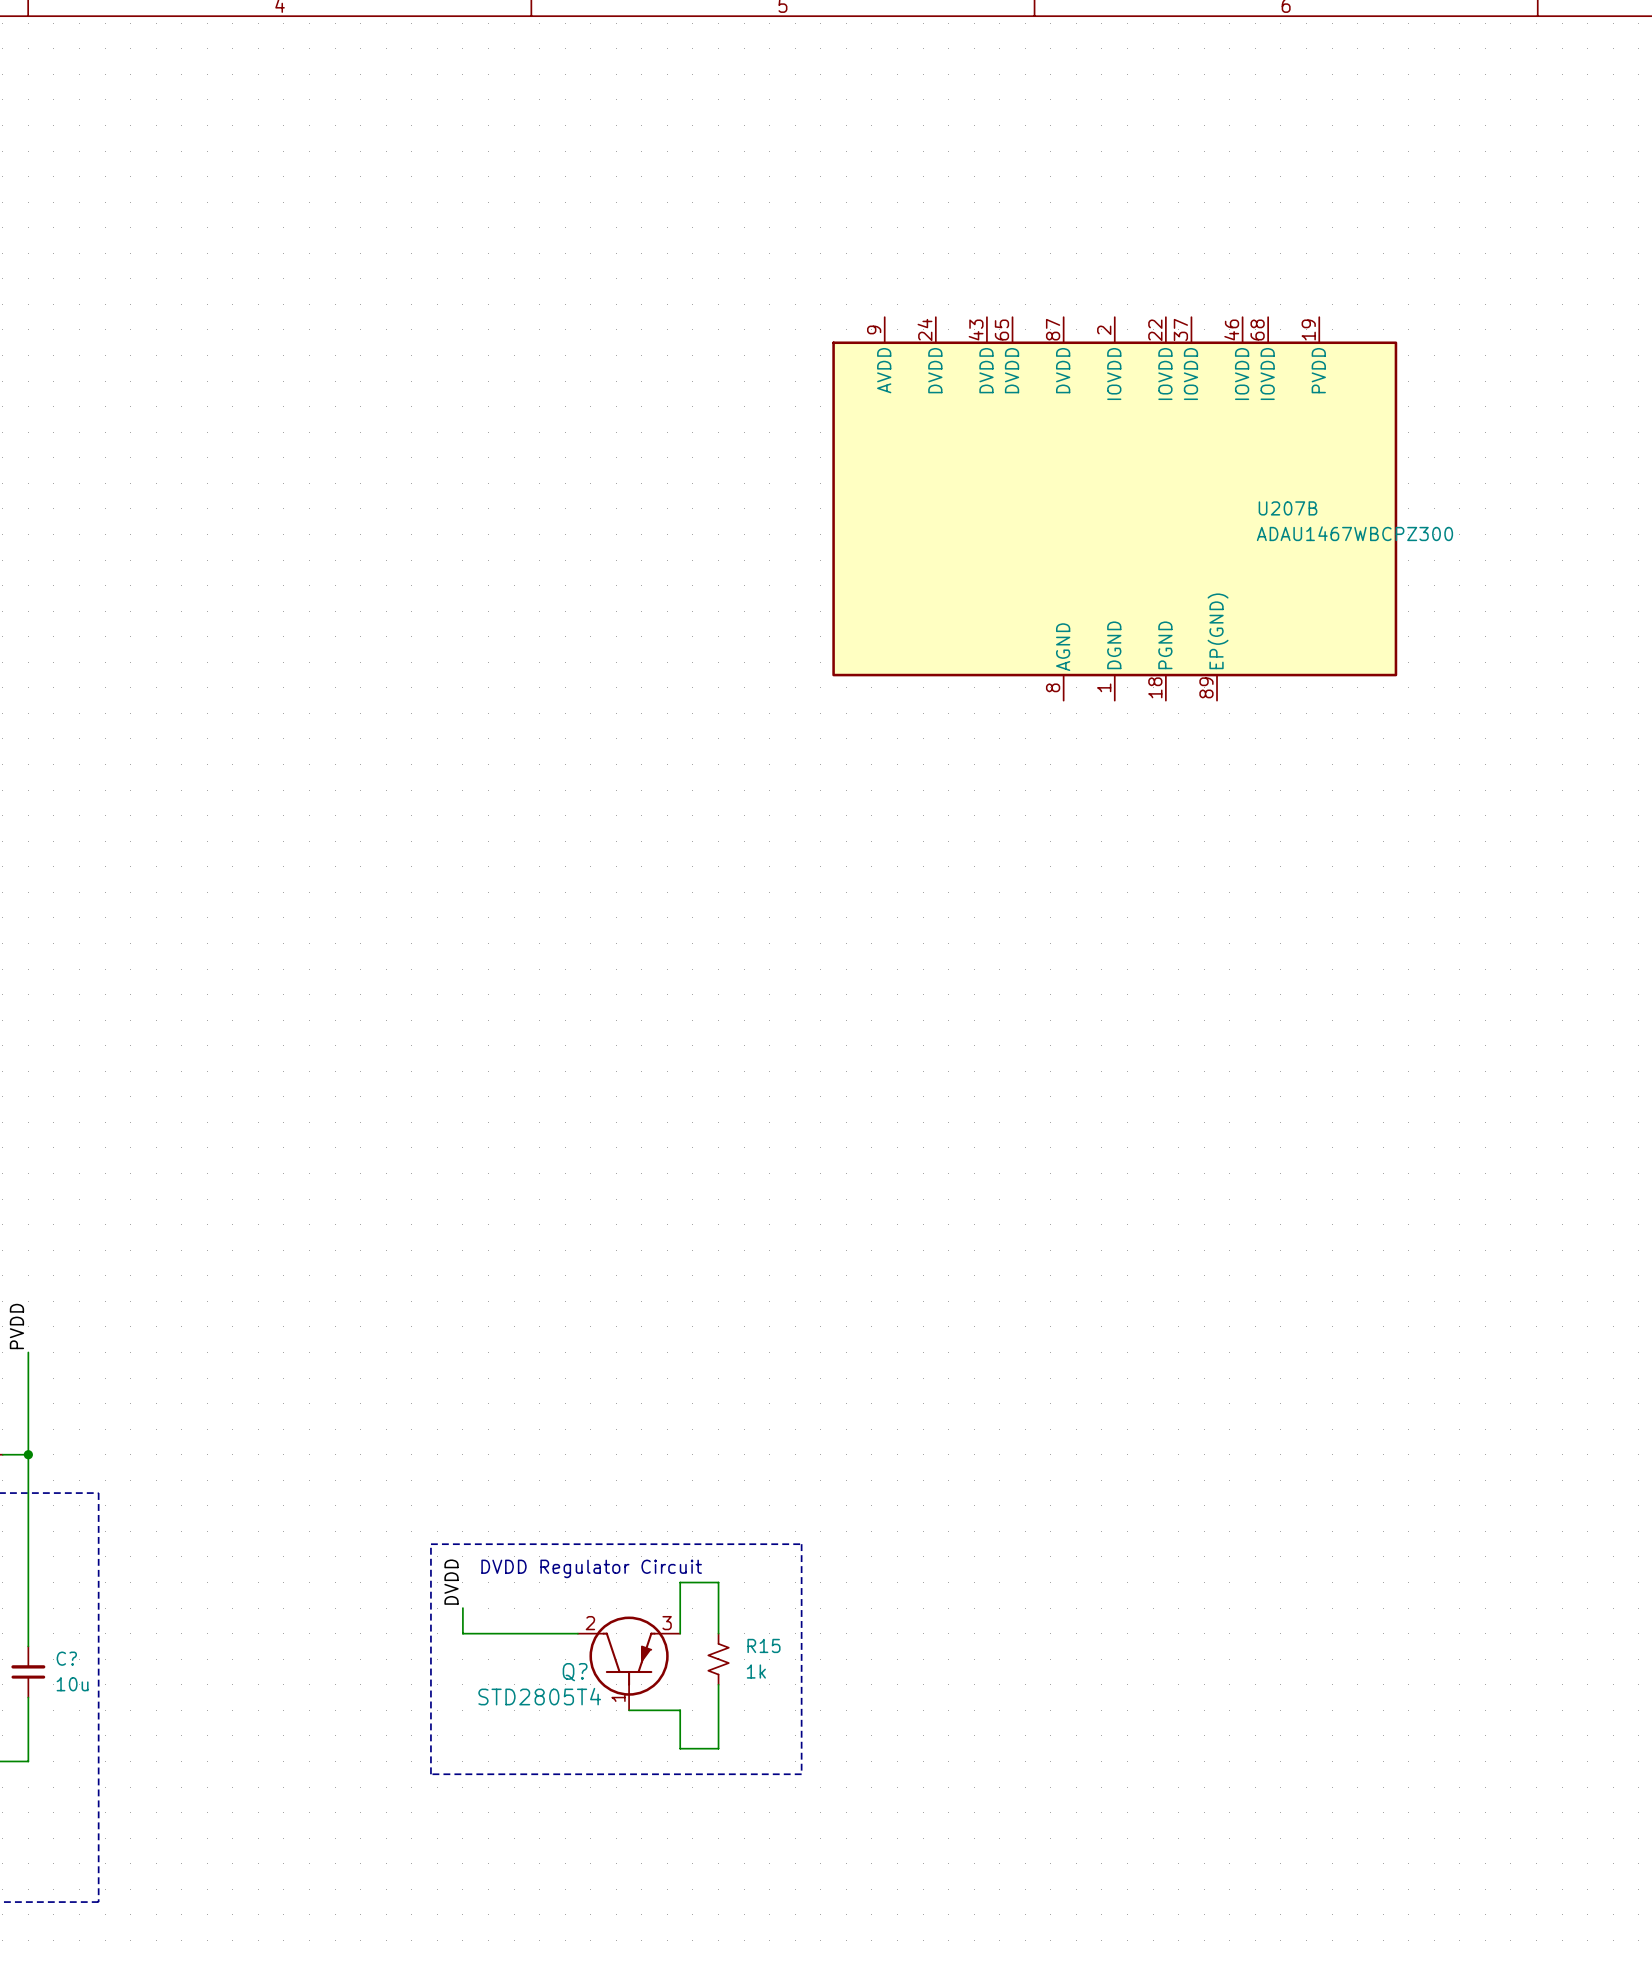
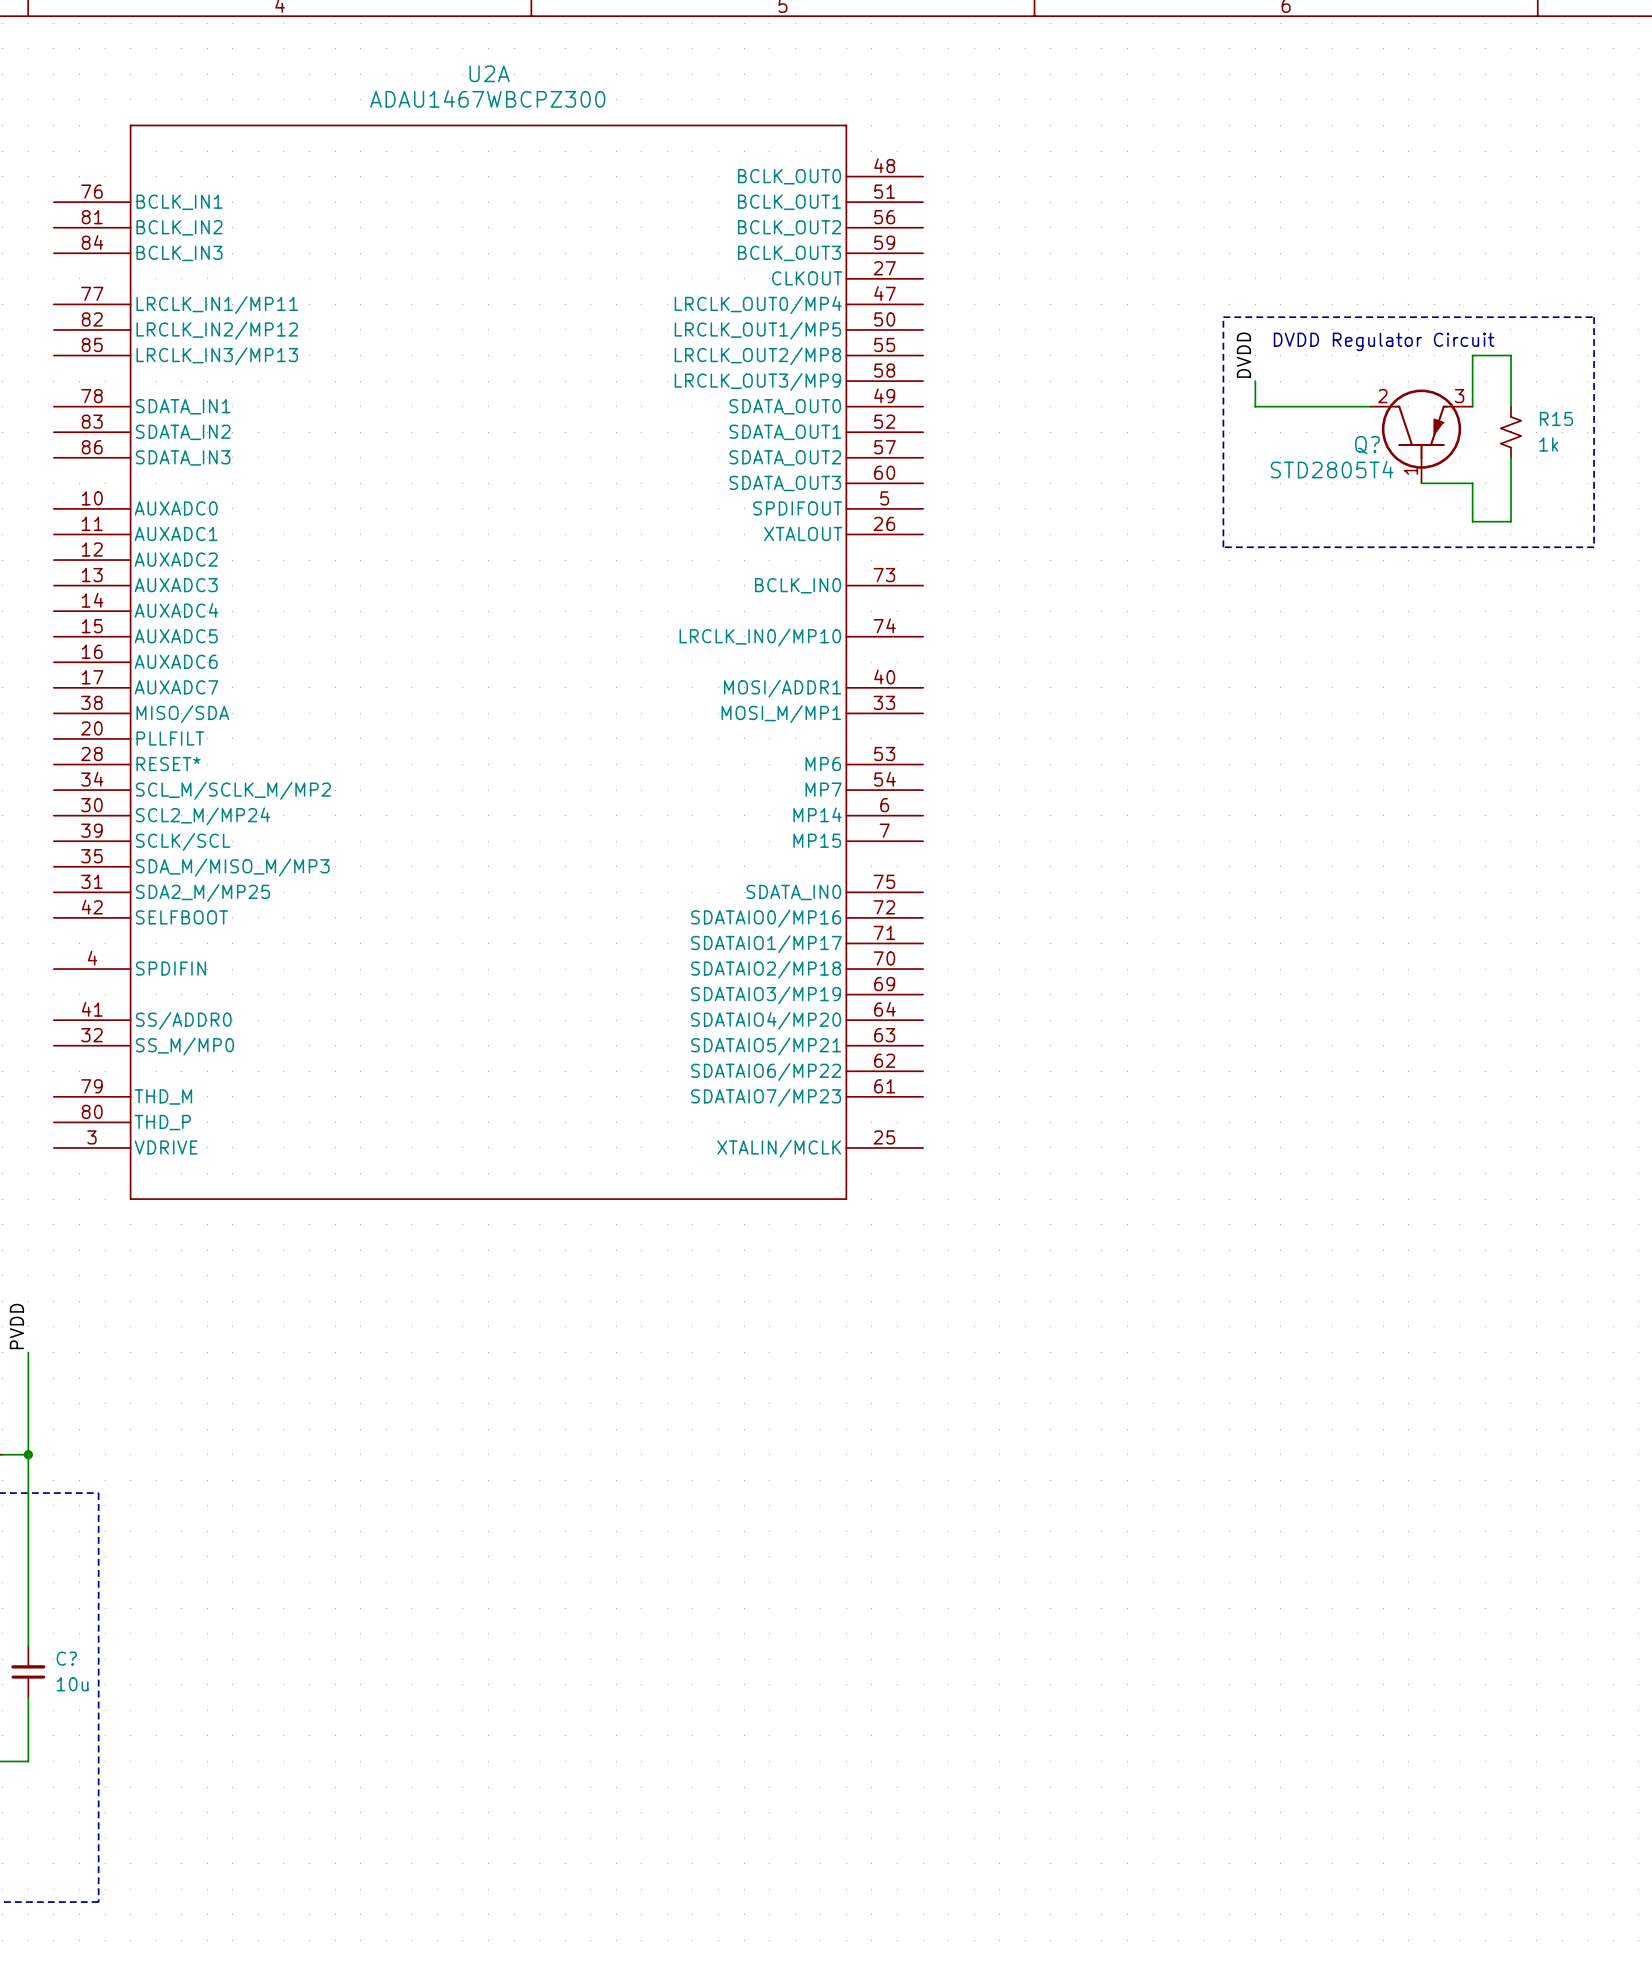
line: none -> (1223, 317) (1594, 317) (1594, 547) (1223, 547) (1223, 317)
text: none -> DVDD Regulator Circuit (1384, 341)
label: none -> DVDD (1243, 355)
wire: none -> (1472, 406) (1472, 355) (1510, 355) (1510, 406)
Q?: none -> STD2805T4 (1421, 436)
wire: none -> (1510, 457) (1510, 521) (1472, 521) (1472, 483) (1421, 483)
U207B: ADAU1467WBCPZ300 (1114, 508) -> none
U2A: none -> ADAU1467WBCPZ300 (488, 662)
line: (430, 1544) (801, 1544) (801, 1774) (430, 1774) (430, 1544) -> none
text: DVDD Regulator Circuit (591, 1568) -> none
label: DVDD (451, 1582) -> none
wire: (462, 1608) (462, 1633) (577, 1633) -> none
wire: (680, 1633) (680, 1582) (718, 1582) (718, 1633) -> none
R15 position: (718, 1659) -> (1510, 432)
Q?: STD2805T4 (629, 1663) -> none
wire: (718, 1684) (718, 1748) (680, 1748) (680, 1710) (629, 1710) -> none

